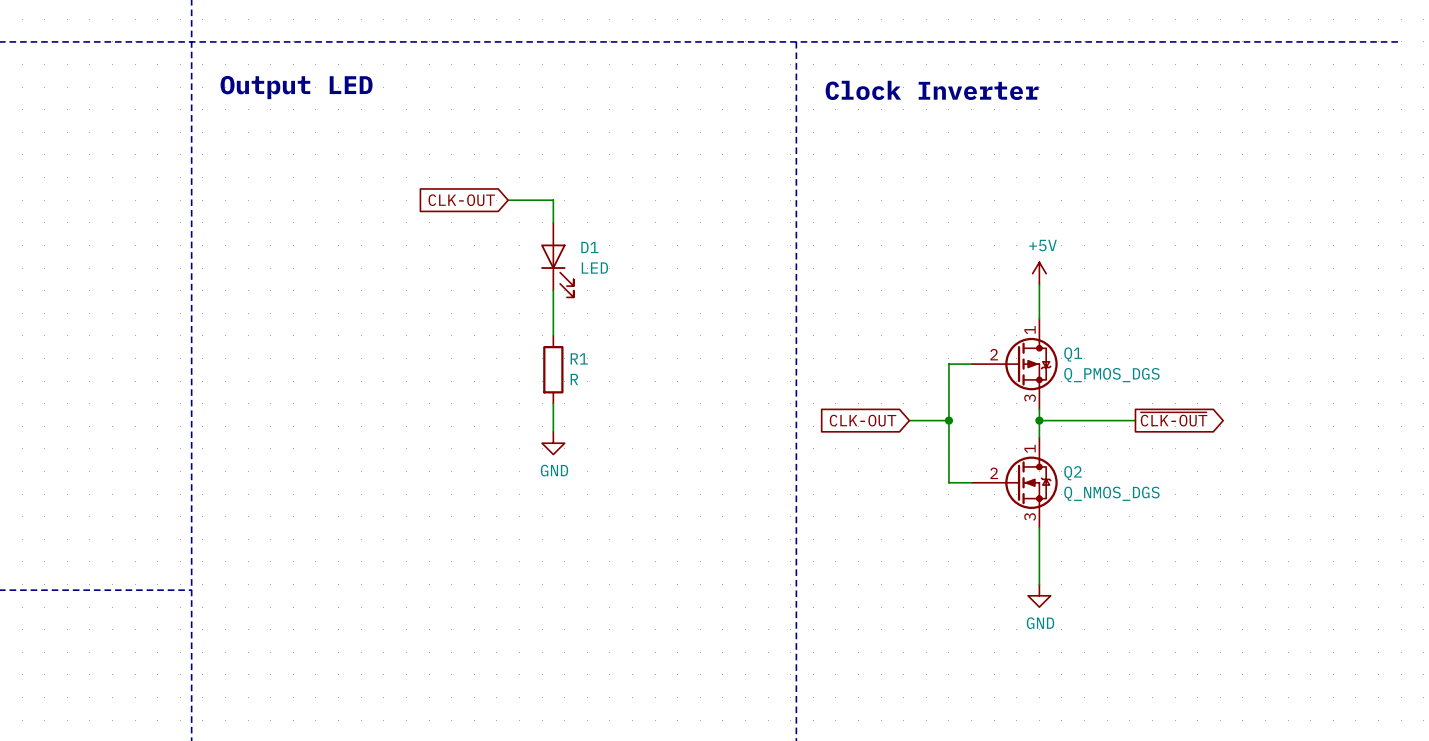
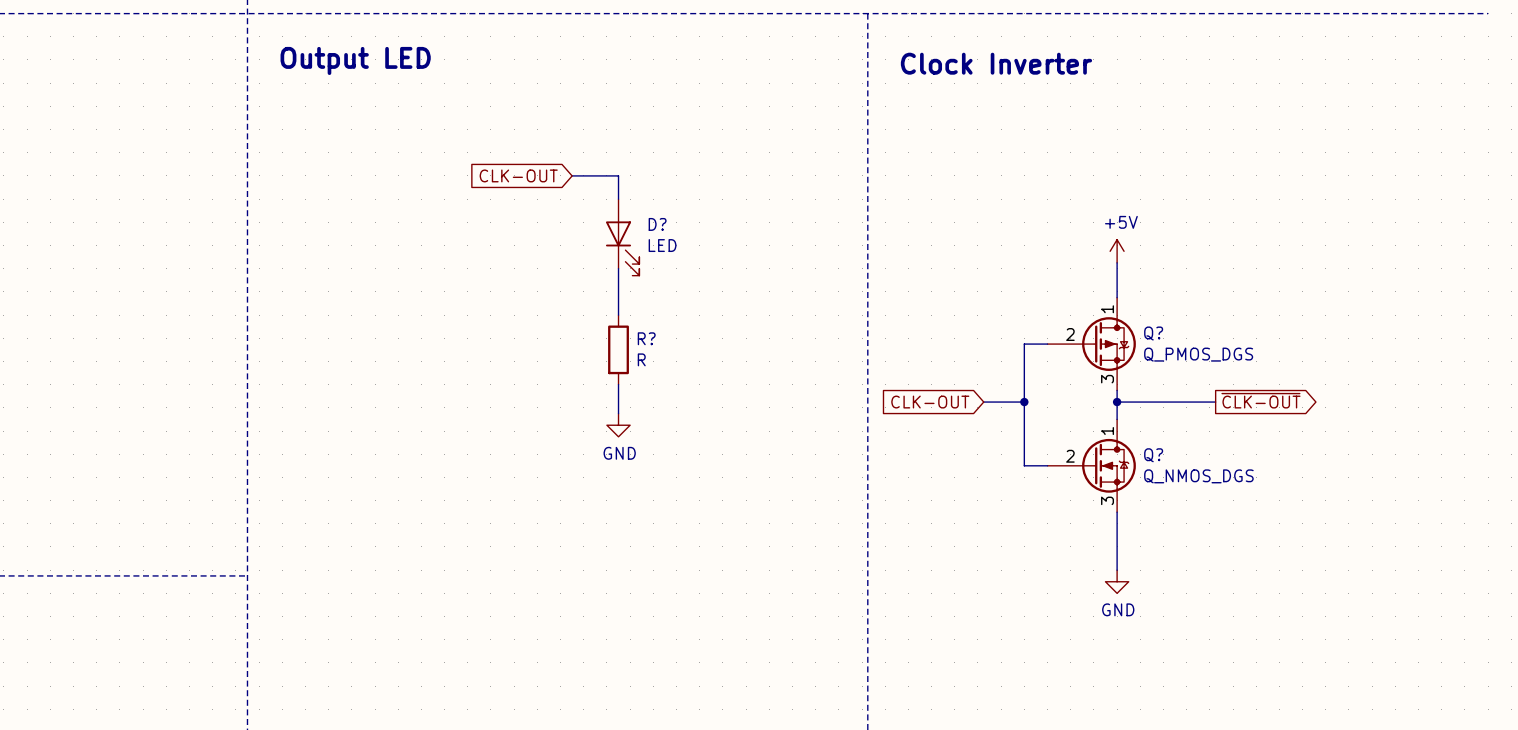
D1 name: D1 (589, 247) -> D? (657, 224)
Q1 name: Q1 (1073, 354) -> Q? (1153, 333)
R1 name: R1 (579, 358) -> R? (646, 338)
Q2 name: Q2 (1073, 473) -> Q? (1153, 455)

